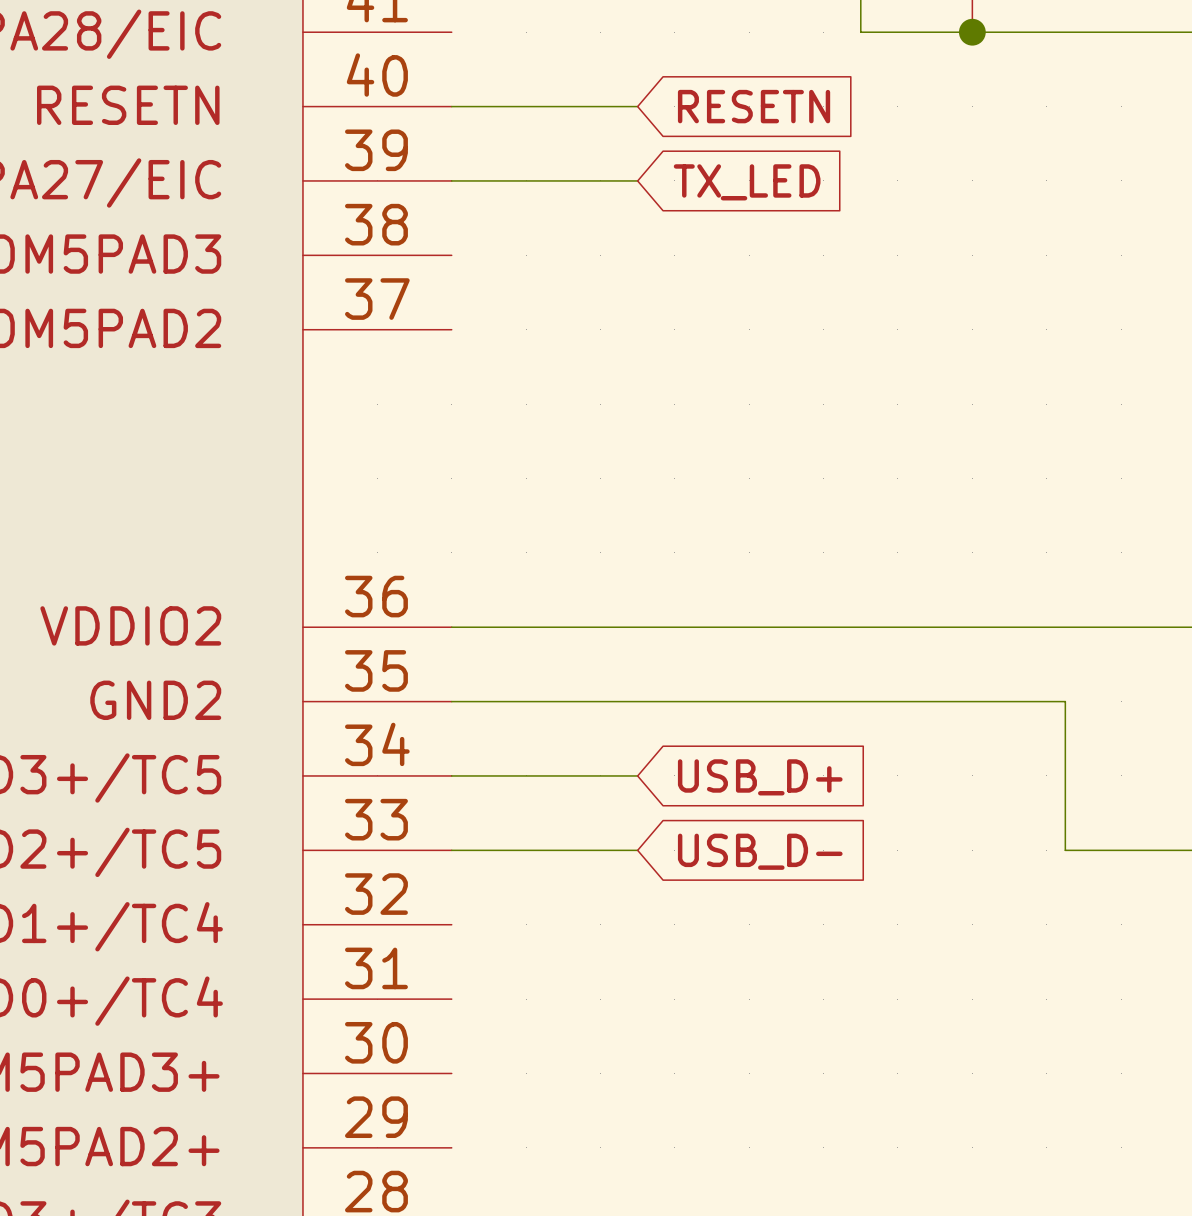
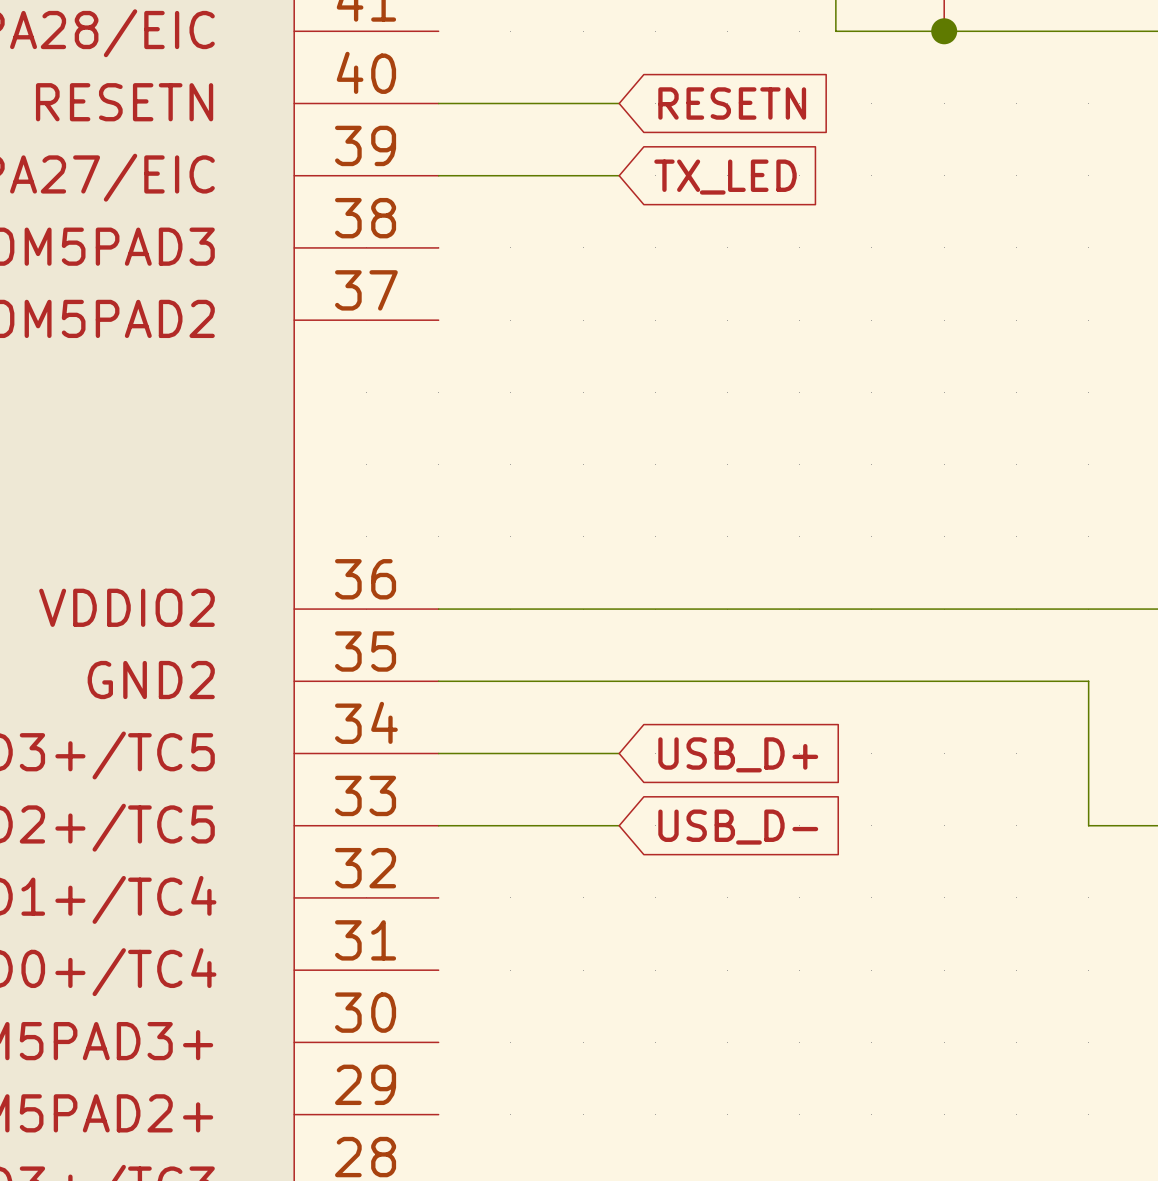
wire: (1065, 701) (1065, 850) (1121, 850) -> (1034, 681) (1088, 681) (1088, 825)

